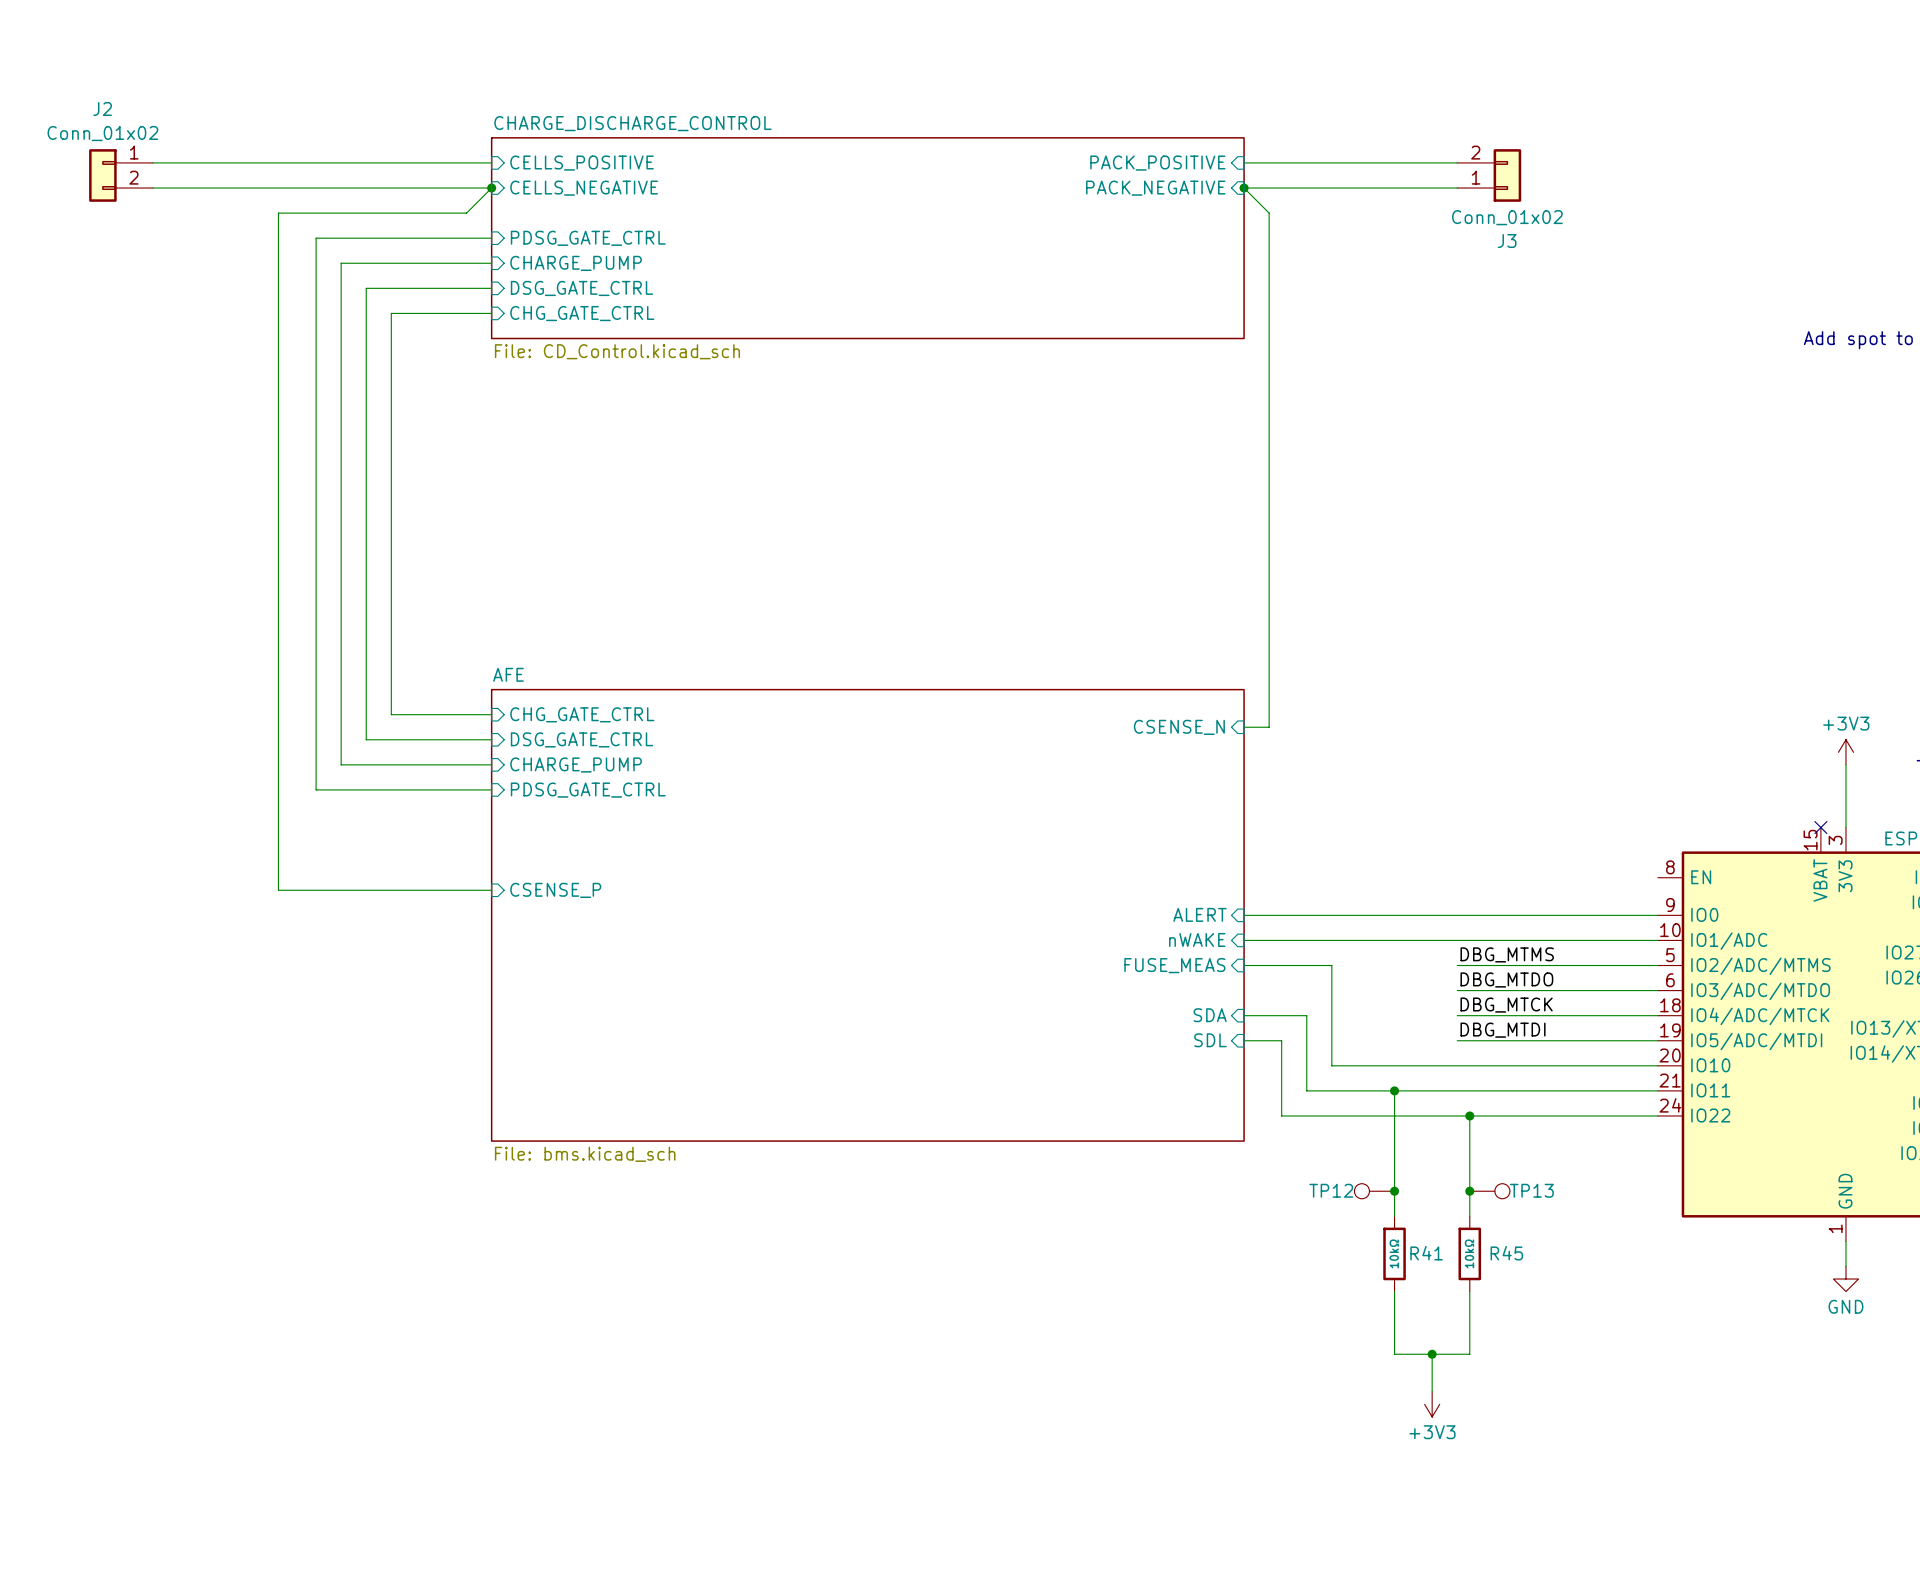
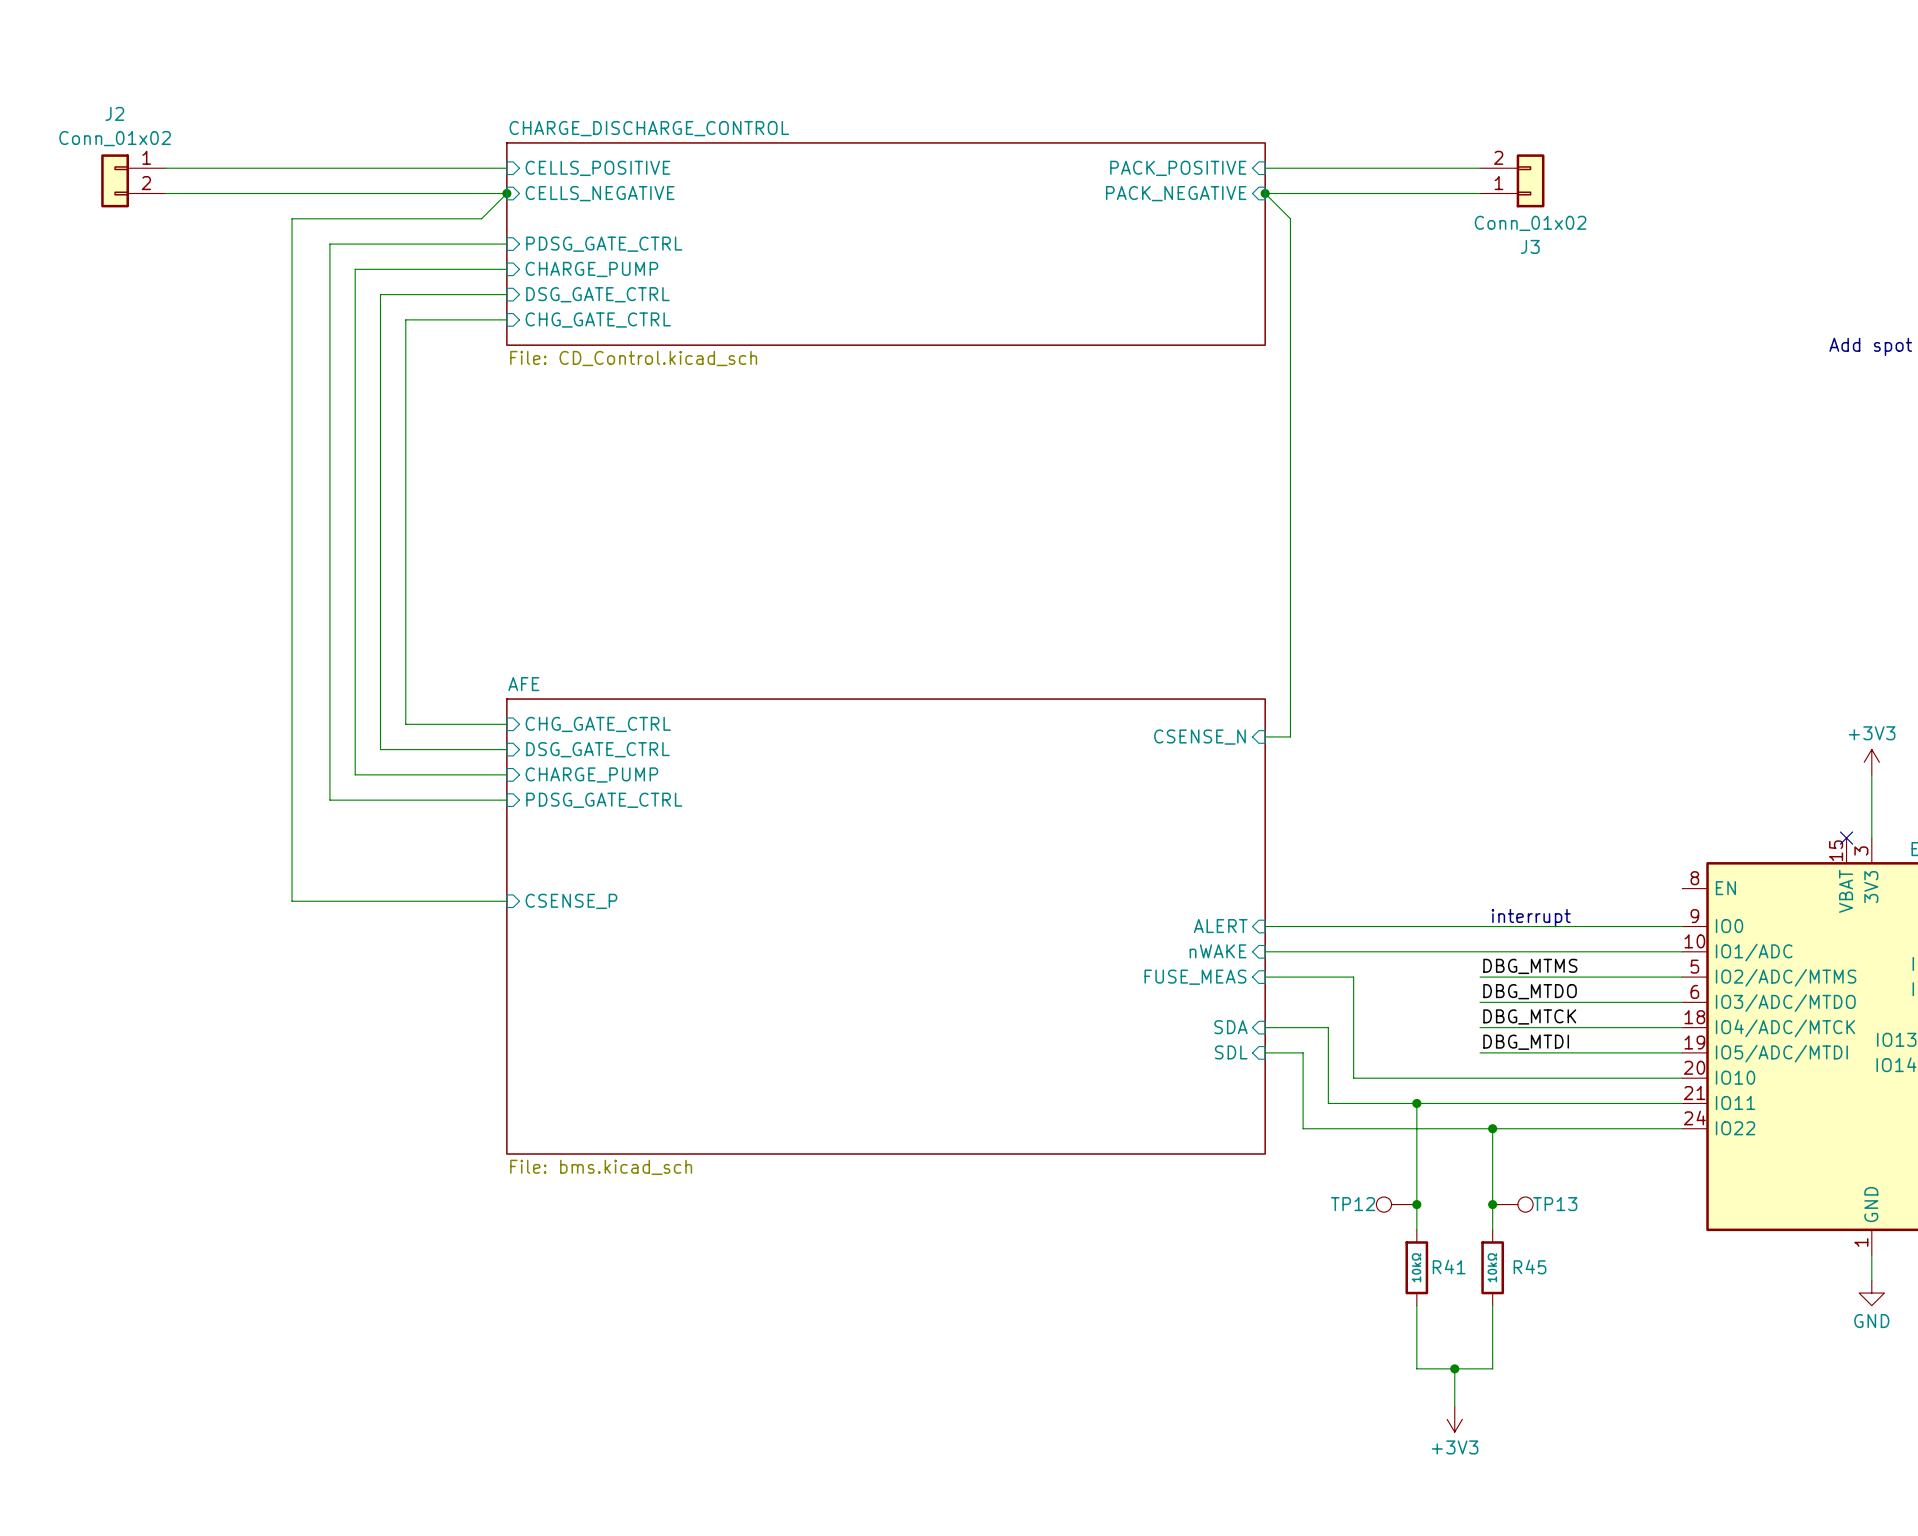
text: none -> interrupt (1531, 918)

